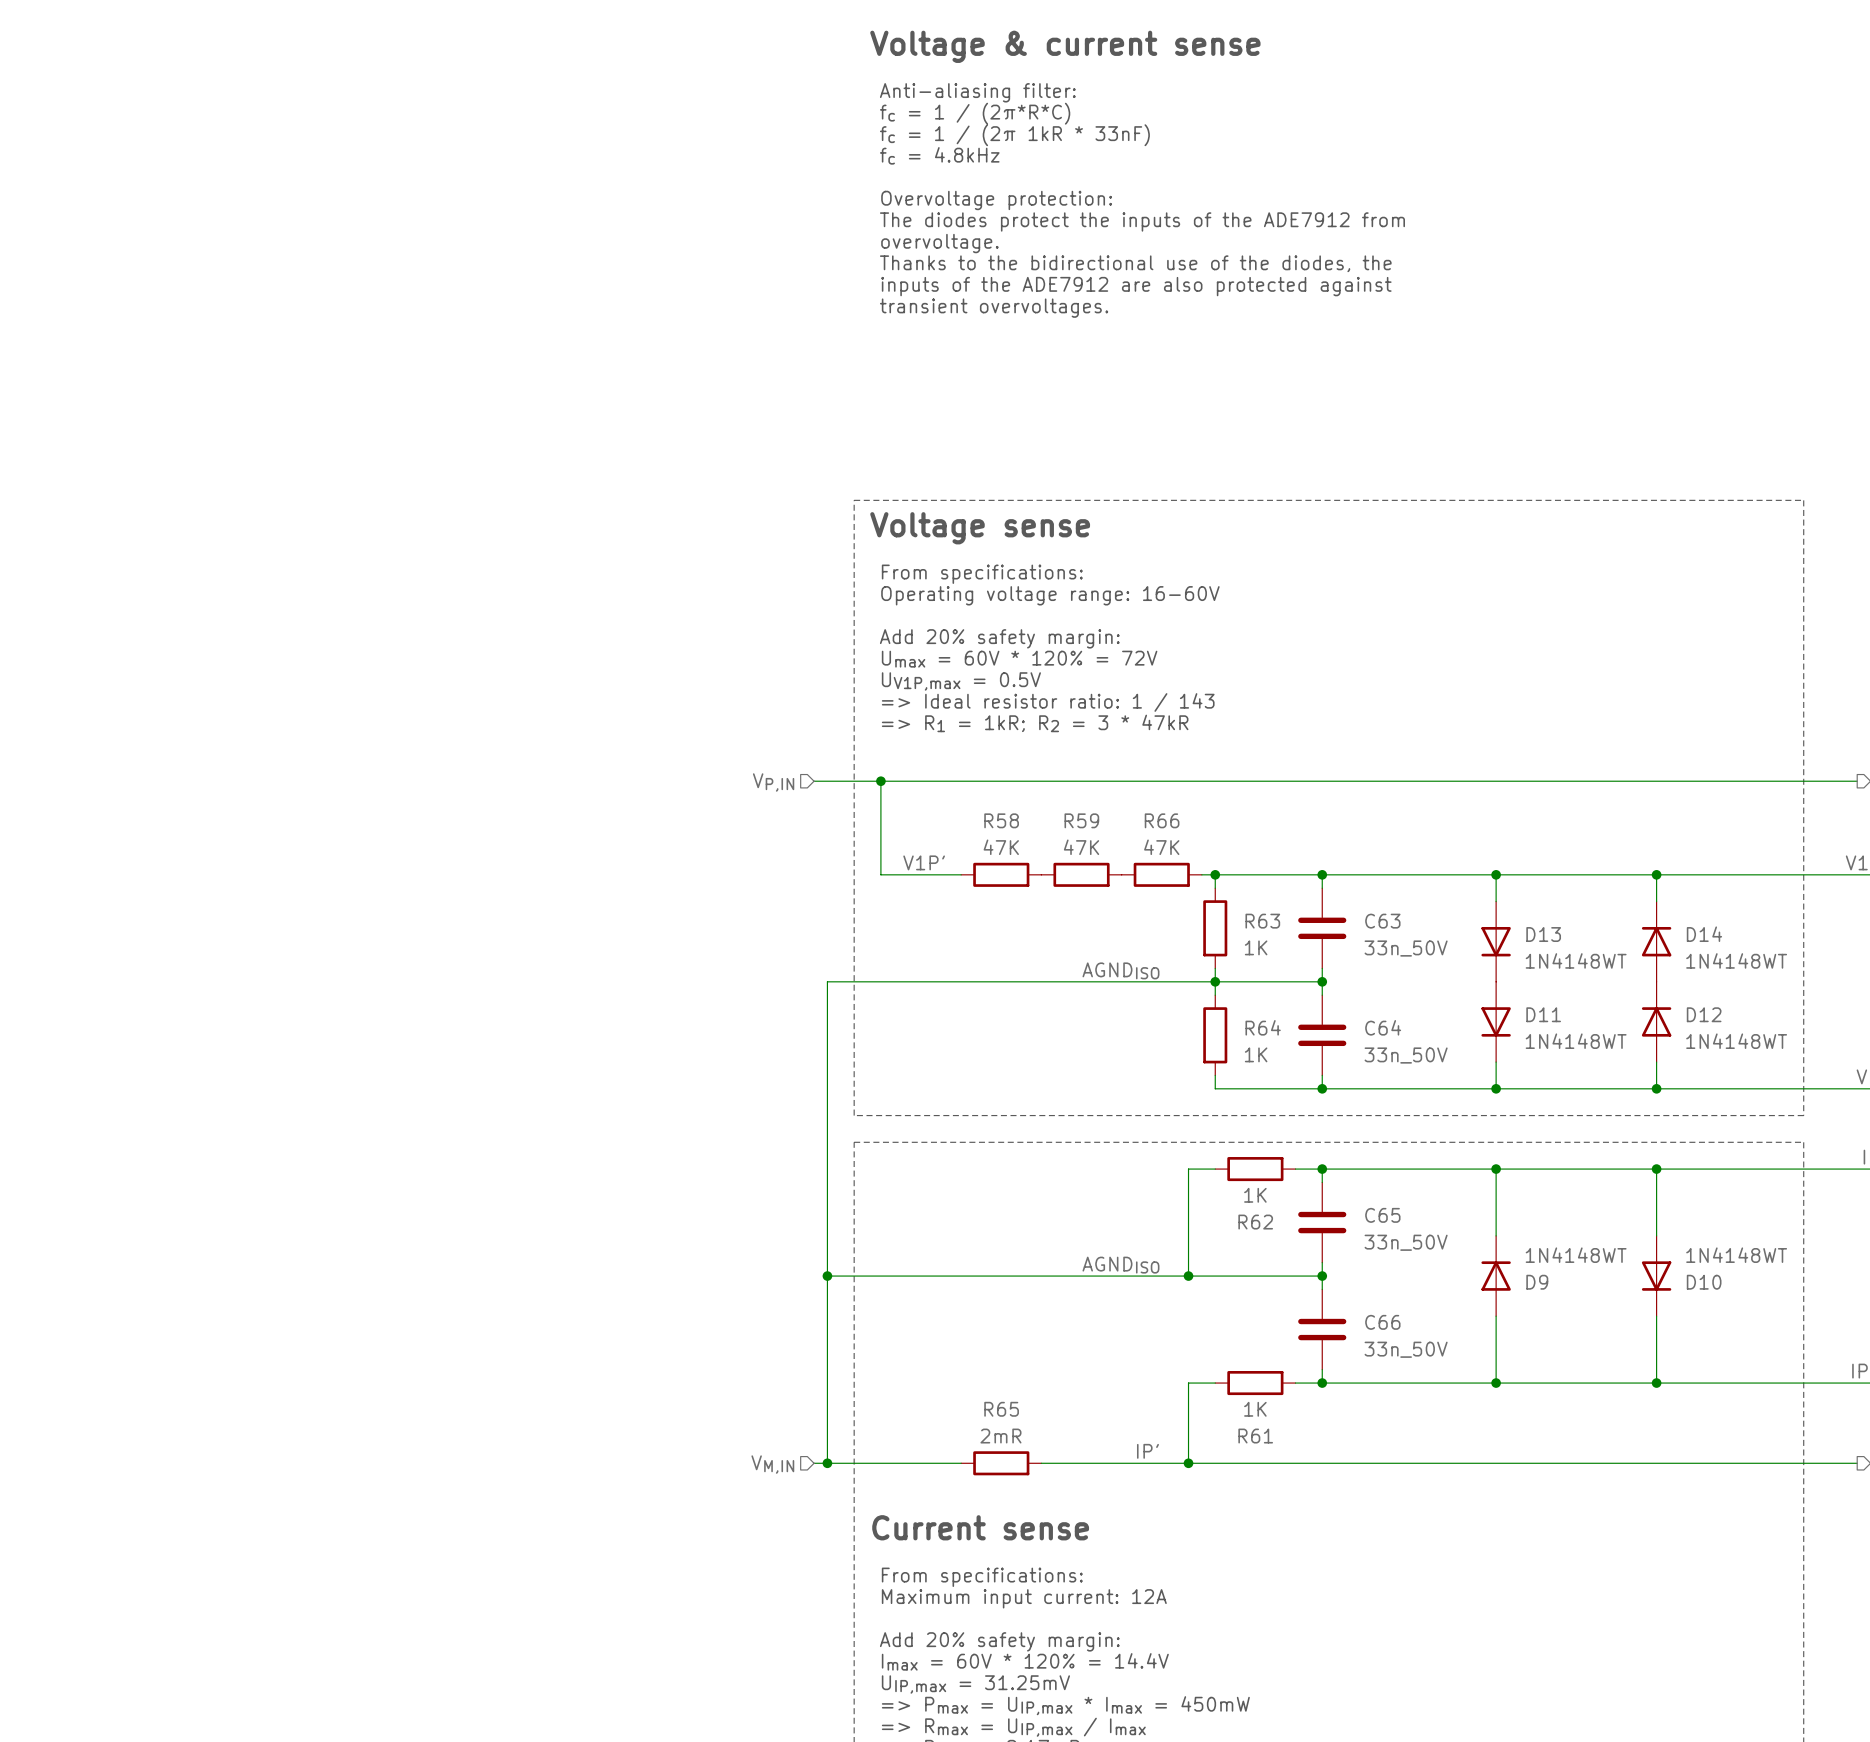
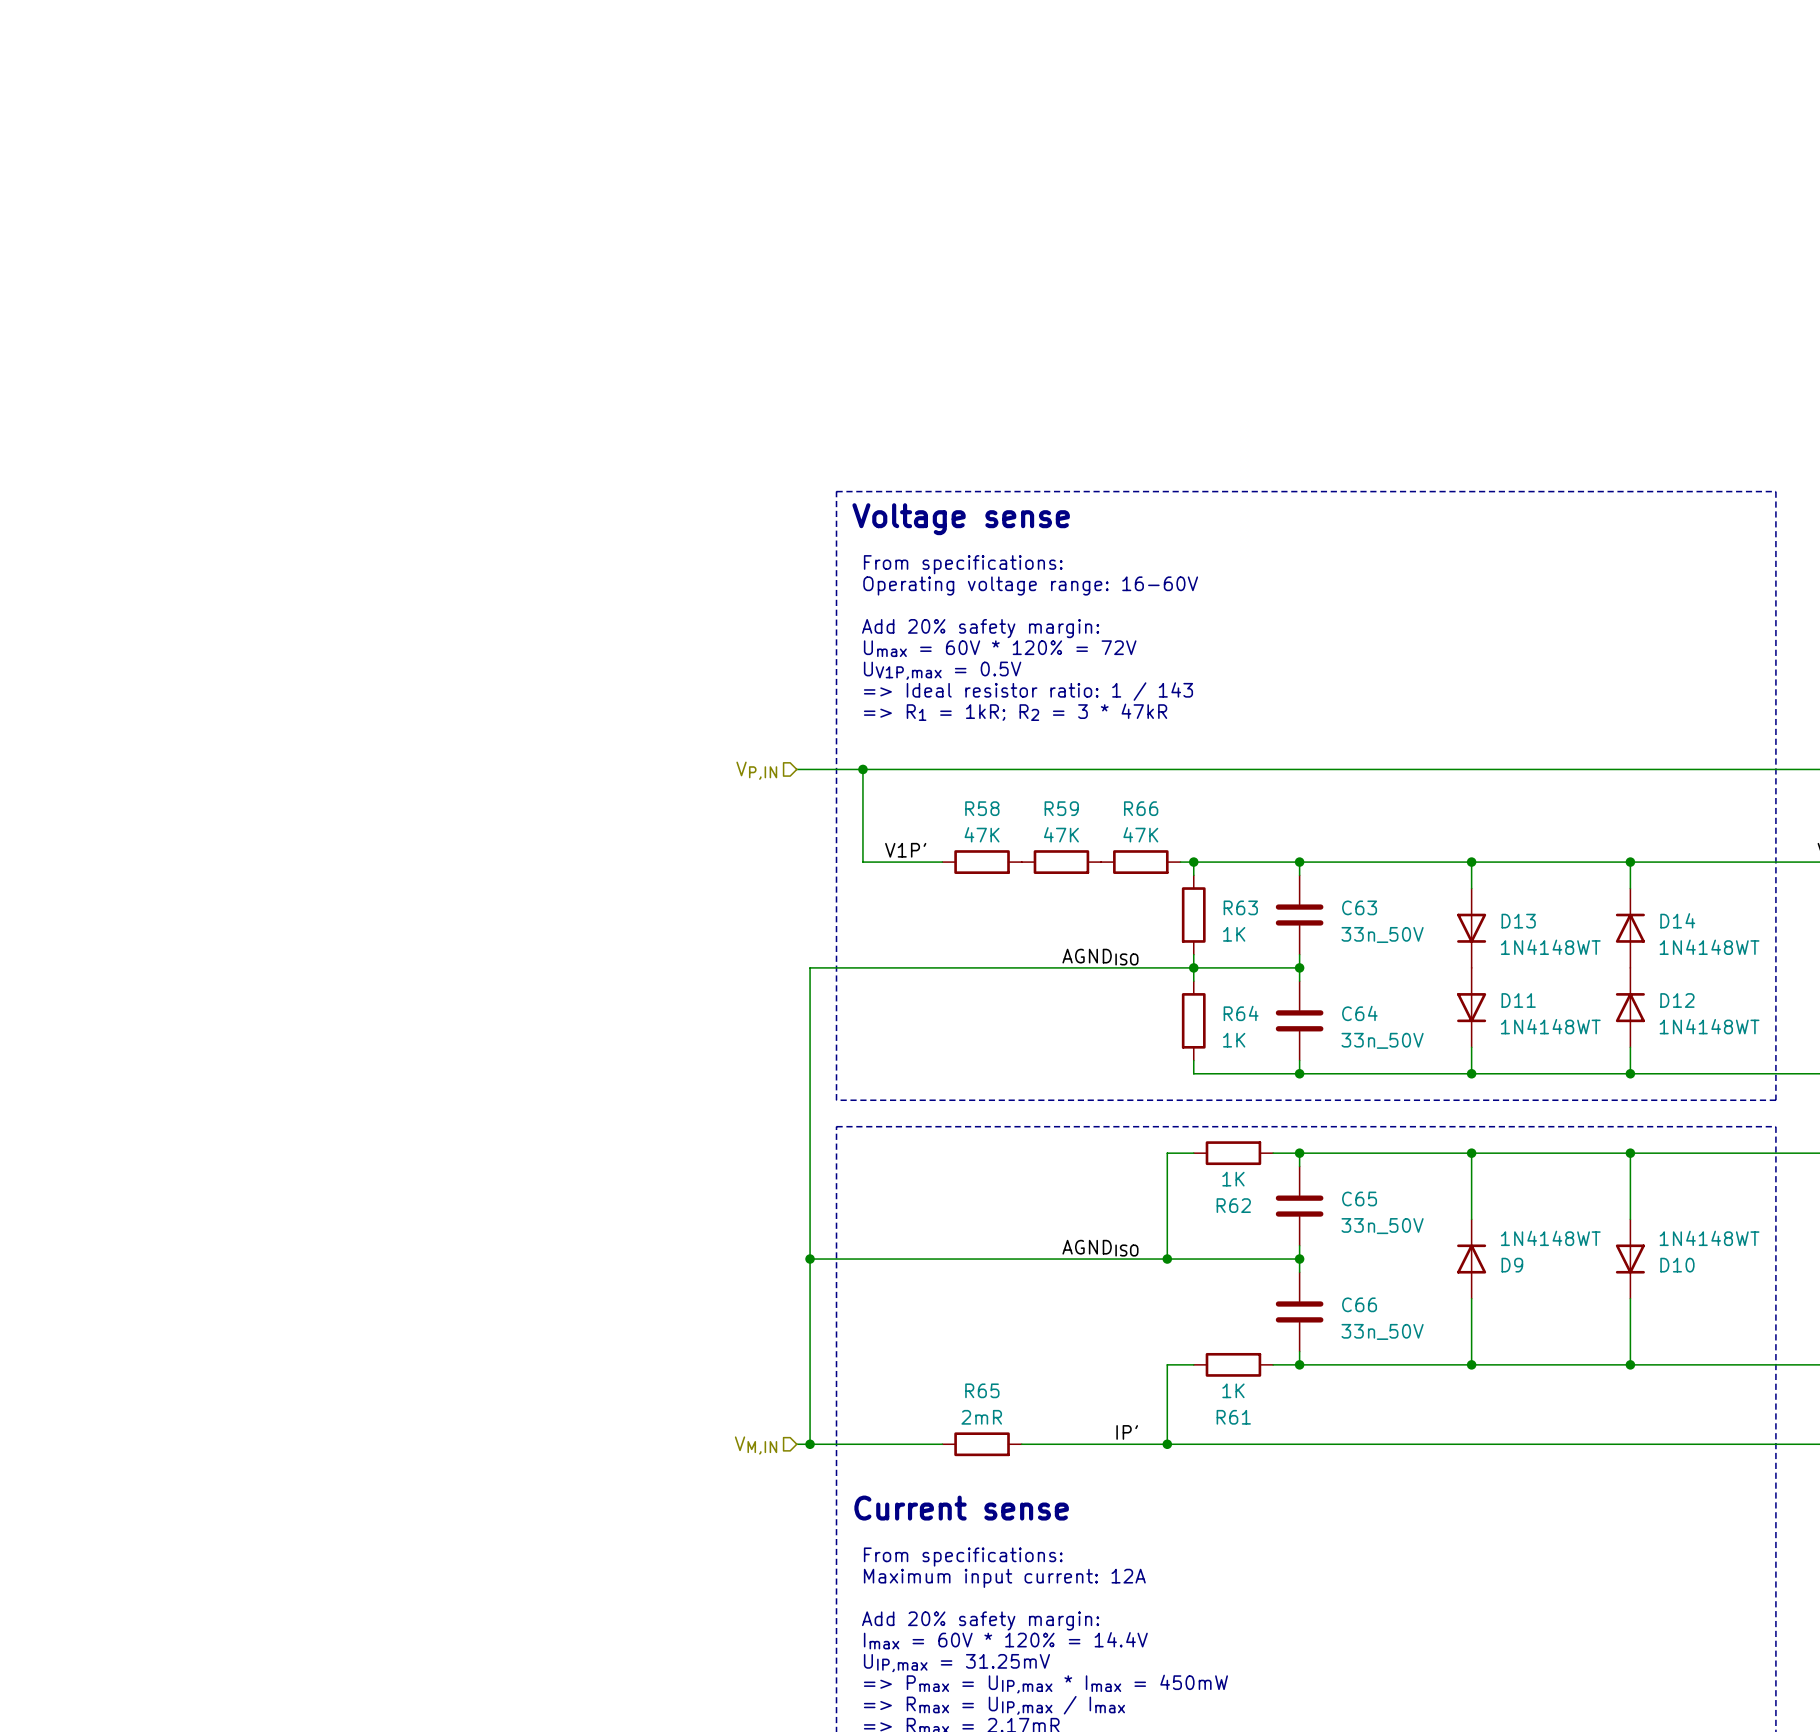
text: Voltage & current sense (1065, 46) -> none
text: Anti-aliasing filter: (977, 92) -> none
text: fc = 1 / (2π*R*C) (975, 113) -> none
text: fc = 1 / (2π 1kR * 33nF) (1014, 135) -> none
text: fc = 4.8kHz (939, 155) -> none
text: Overvoltage protection: (996, 200) -> none
text: The diodes protect the inputs of the ADE7912 from (1142, 221) -> none
text: overvoltage. (939, 243) -> none
text: Thanks to the bidirectional use of the diodes, the (1135, 263) -> none
text: inputs of the ADE7912 are also protected against (1136, 286) -> none
text: transient overvoltages. (994, 308) -> none

